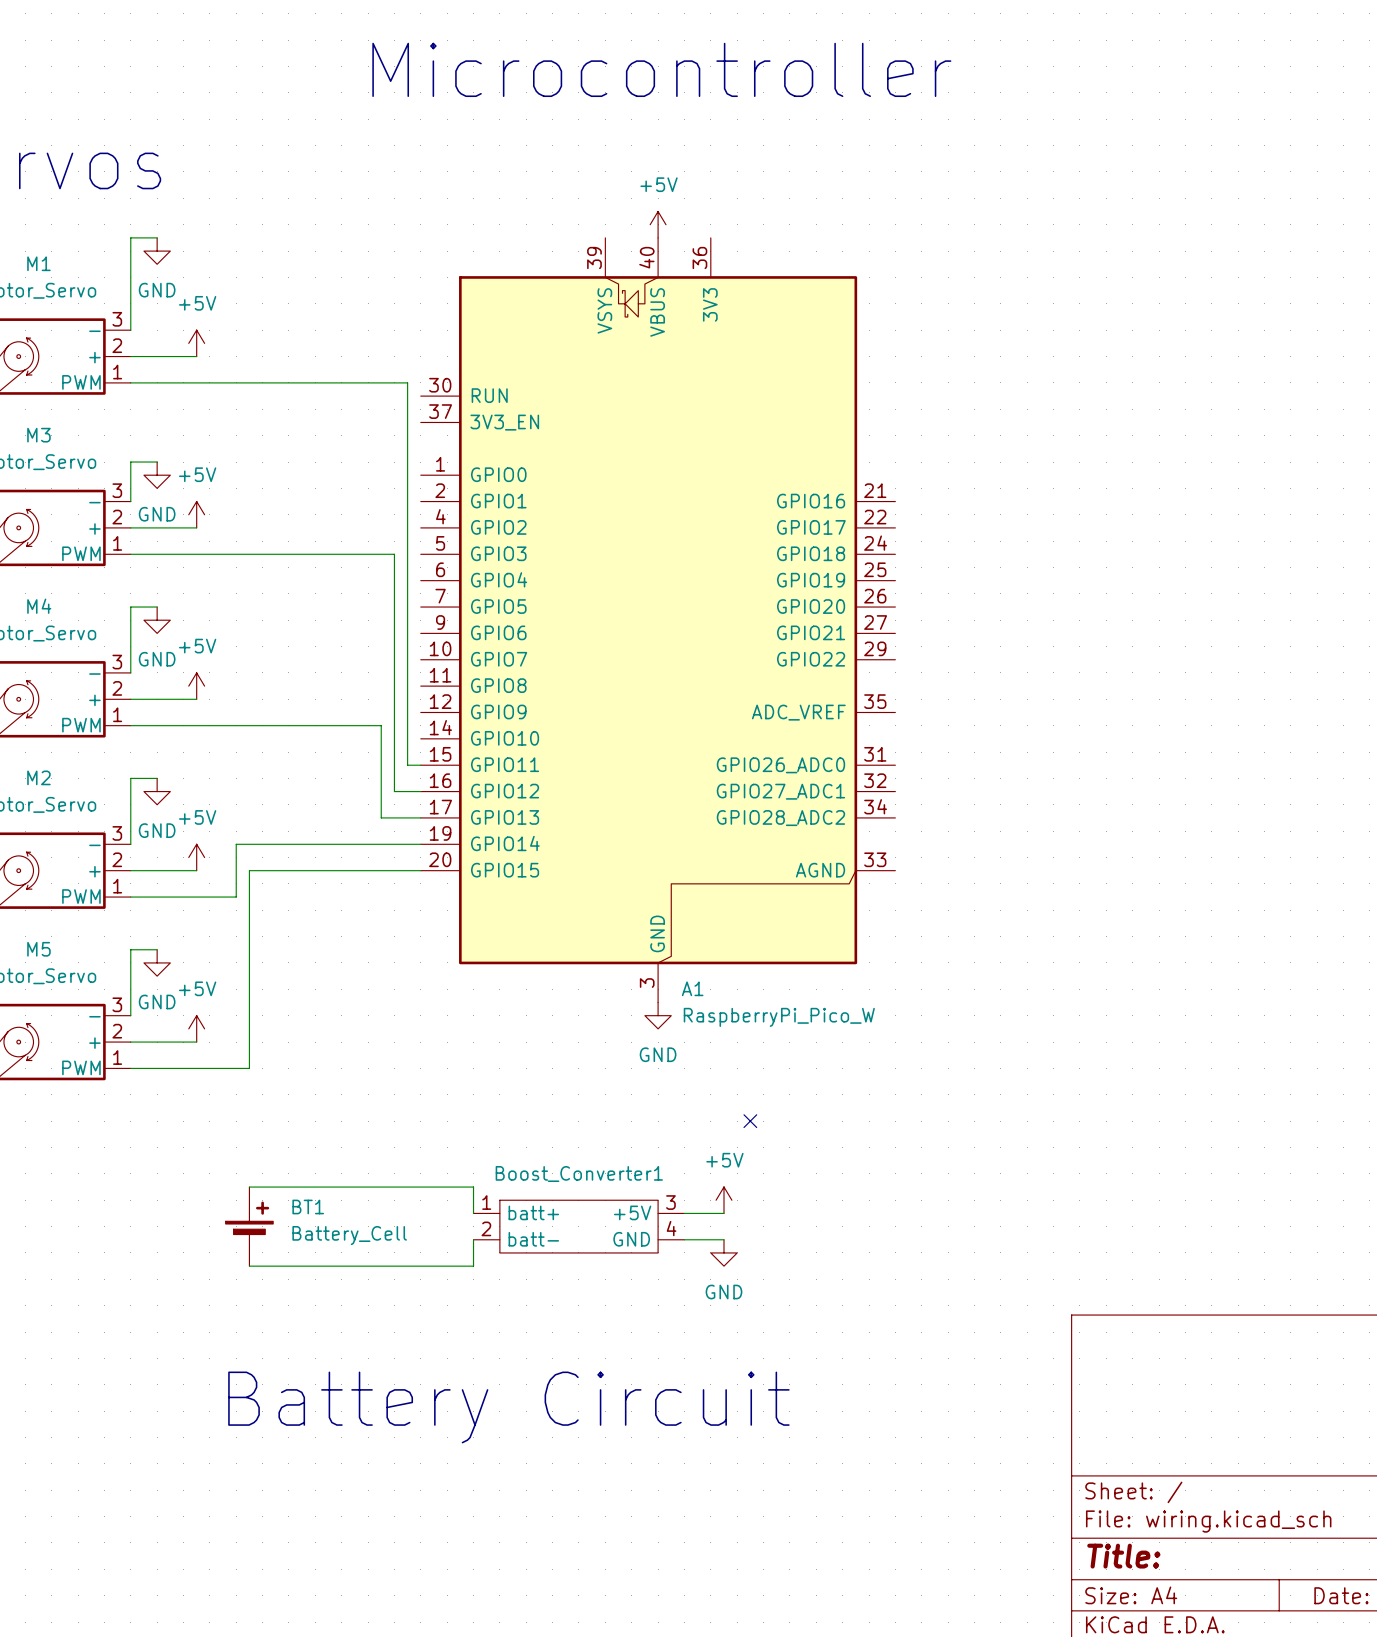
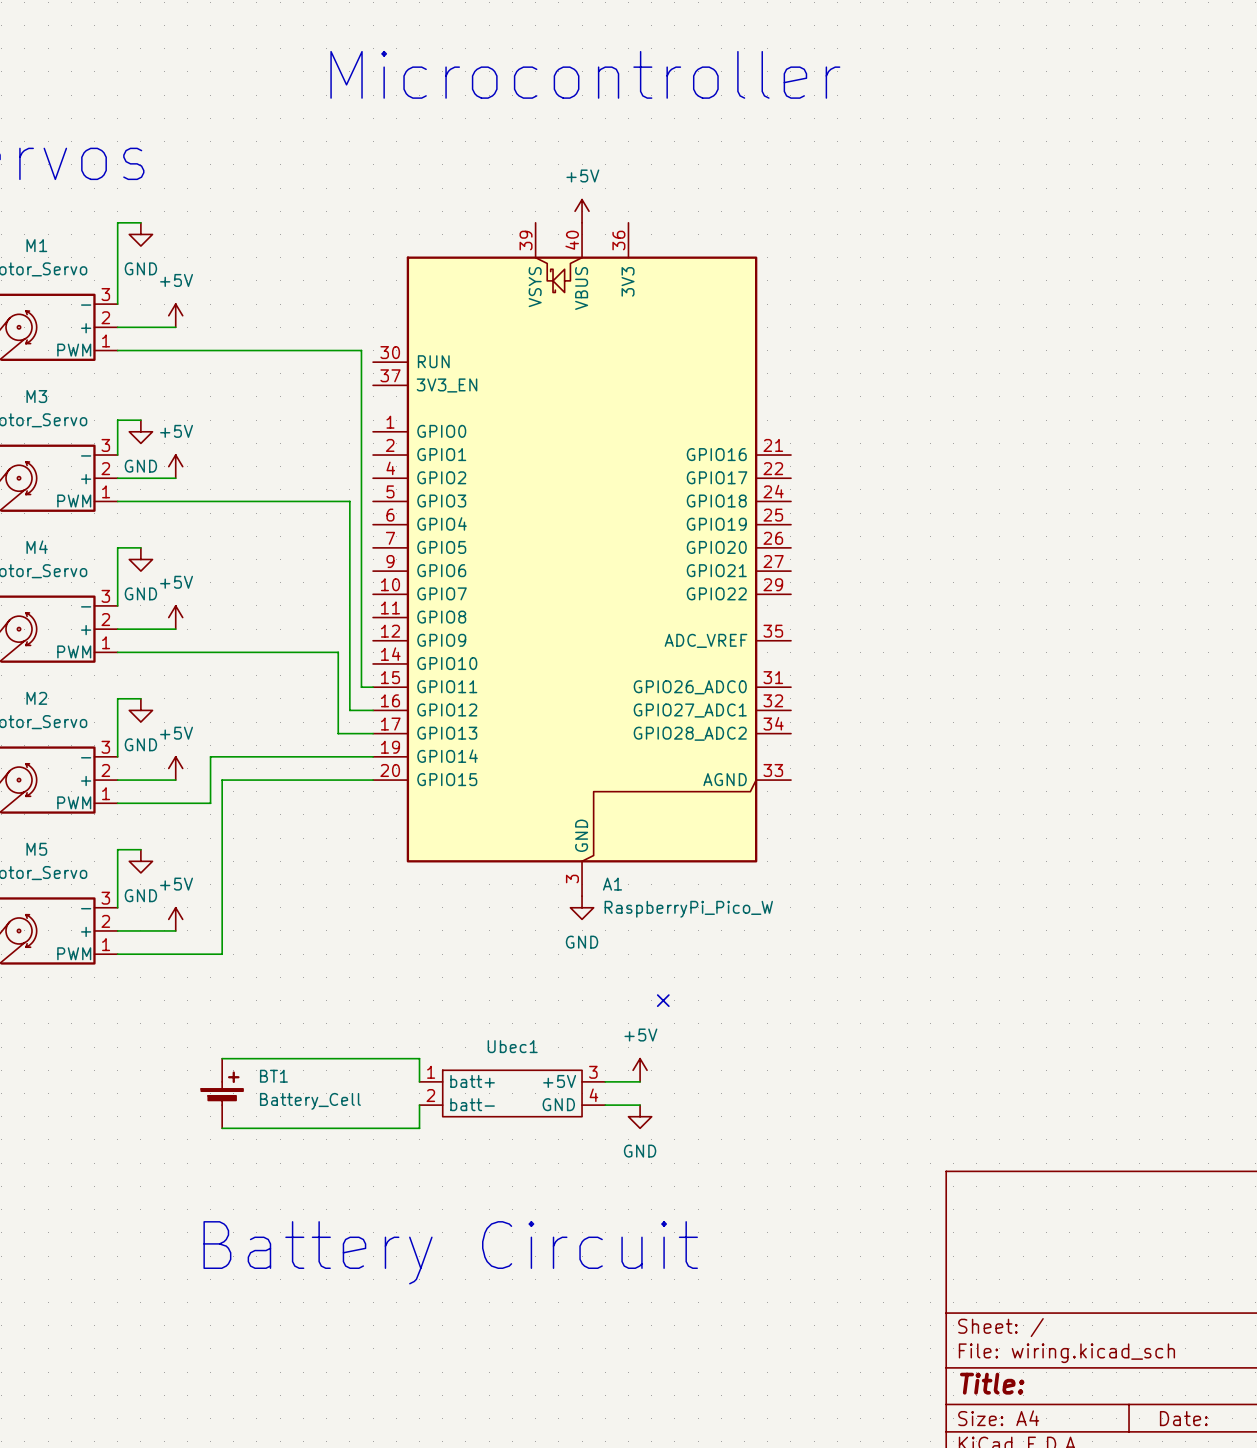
Boost_Converter1 name: Boost_Converter1 (579, 1174) -> Ubec1 (512, 1046)

